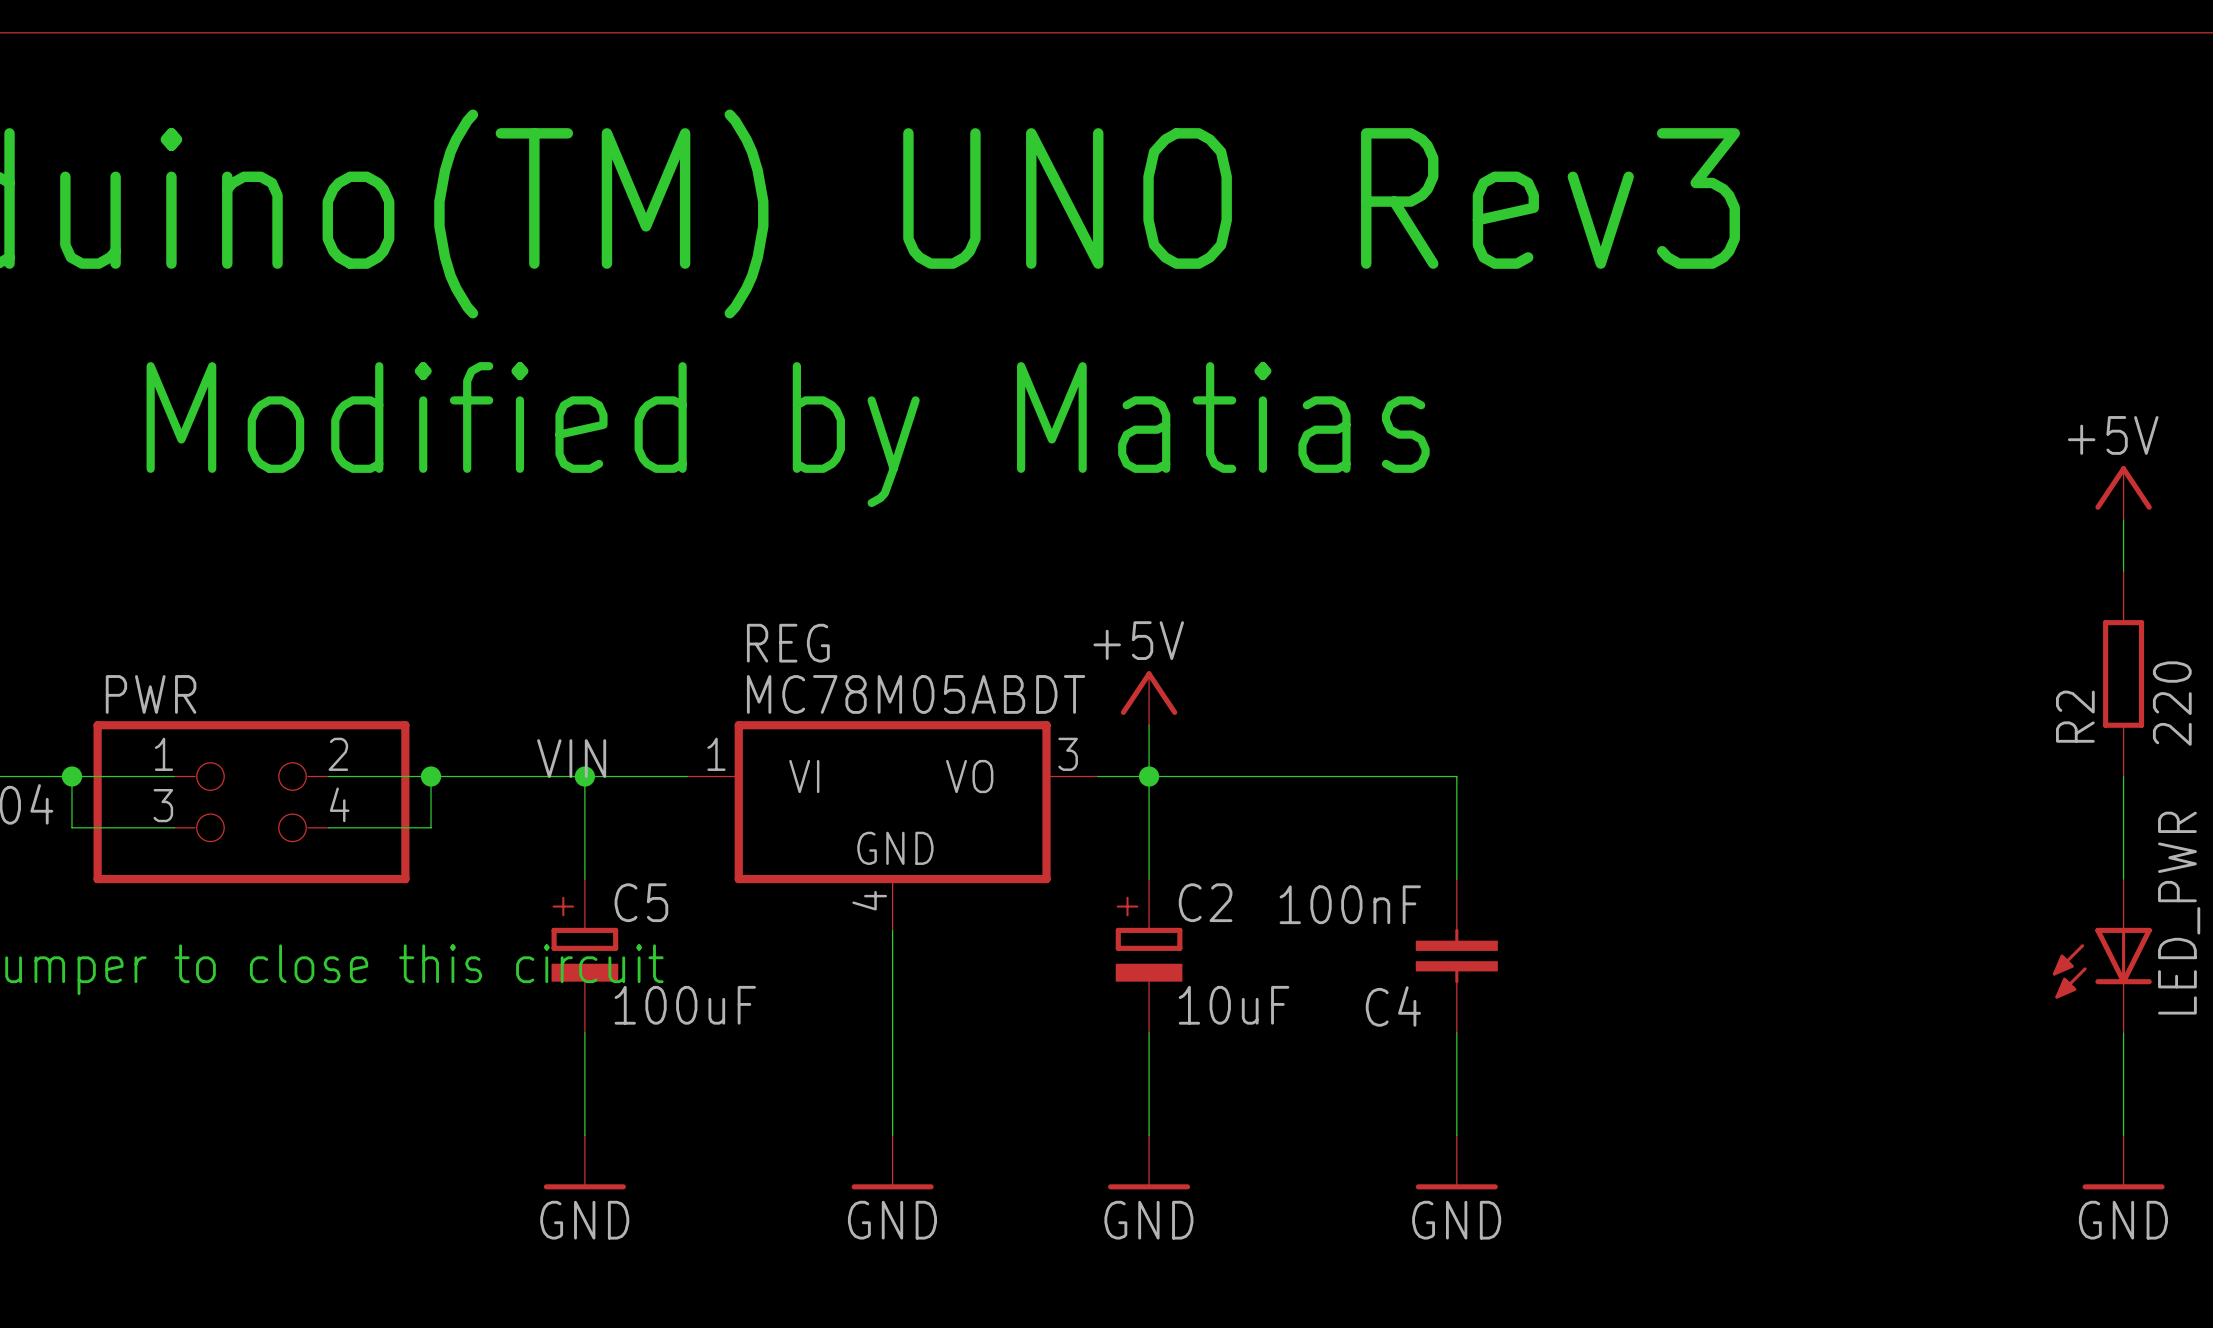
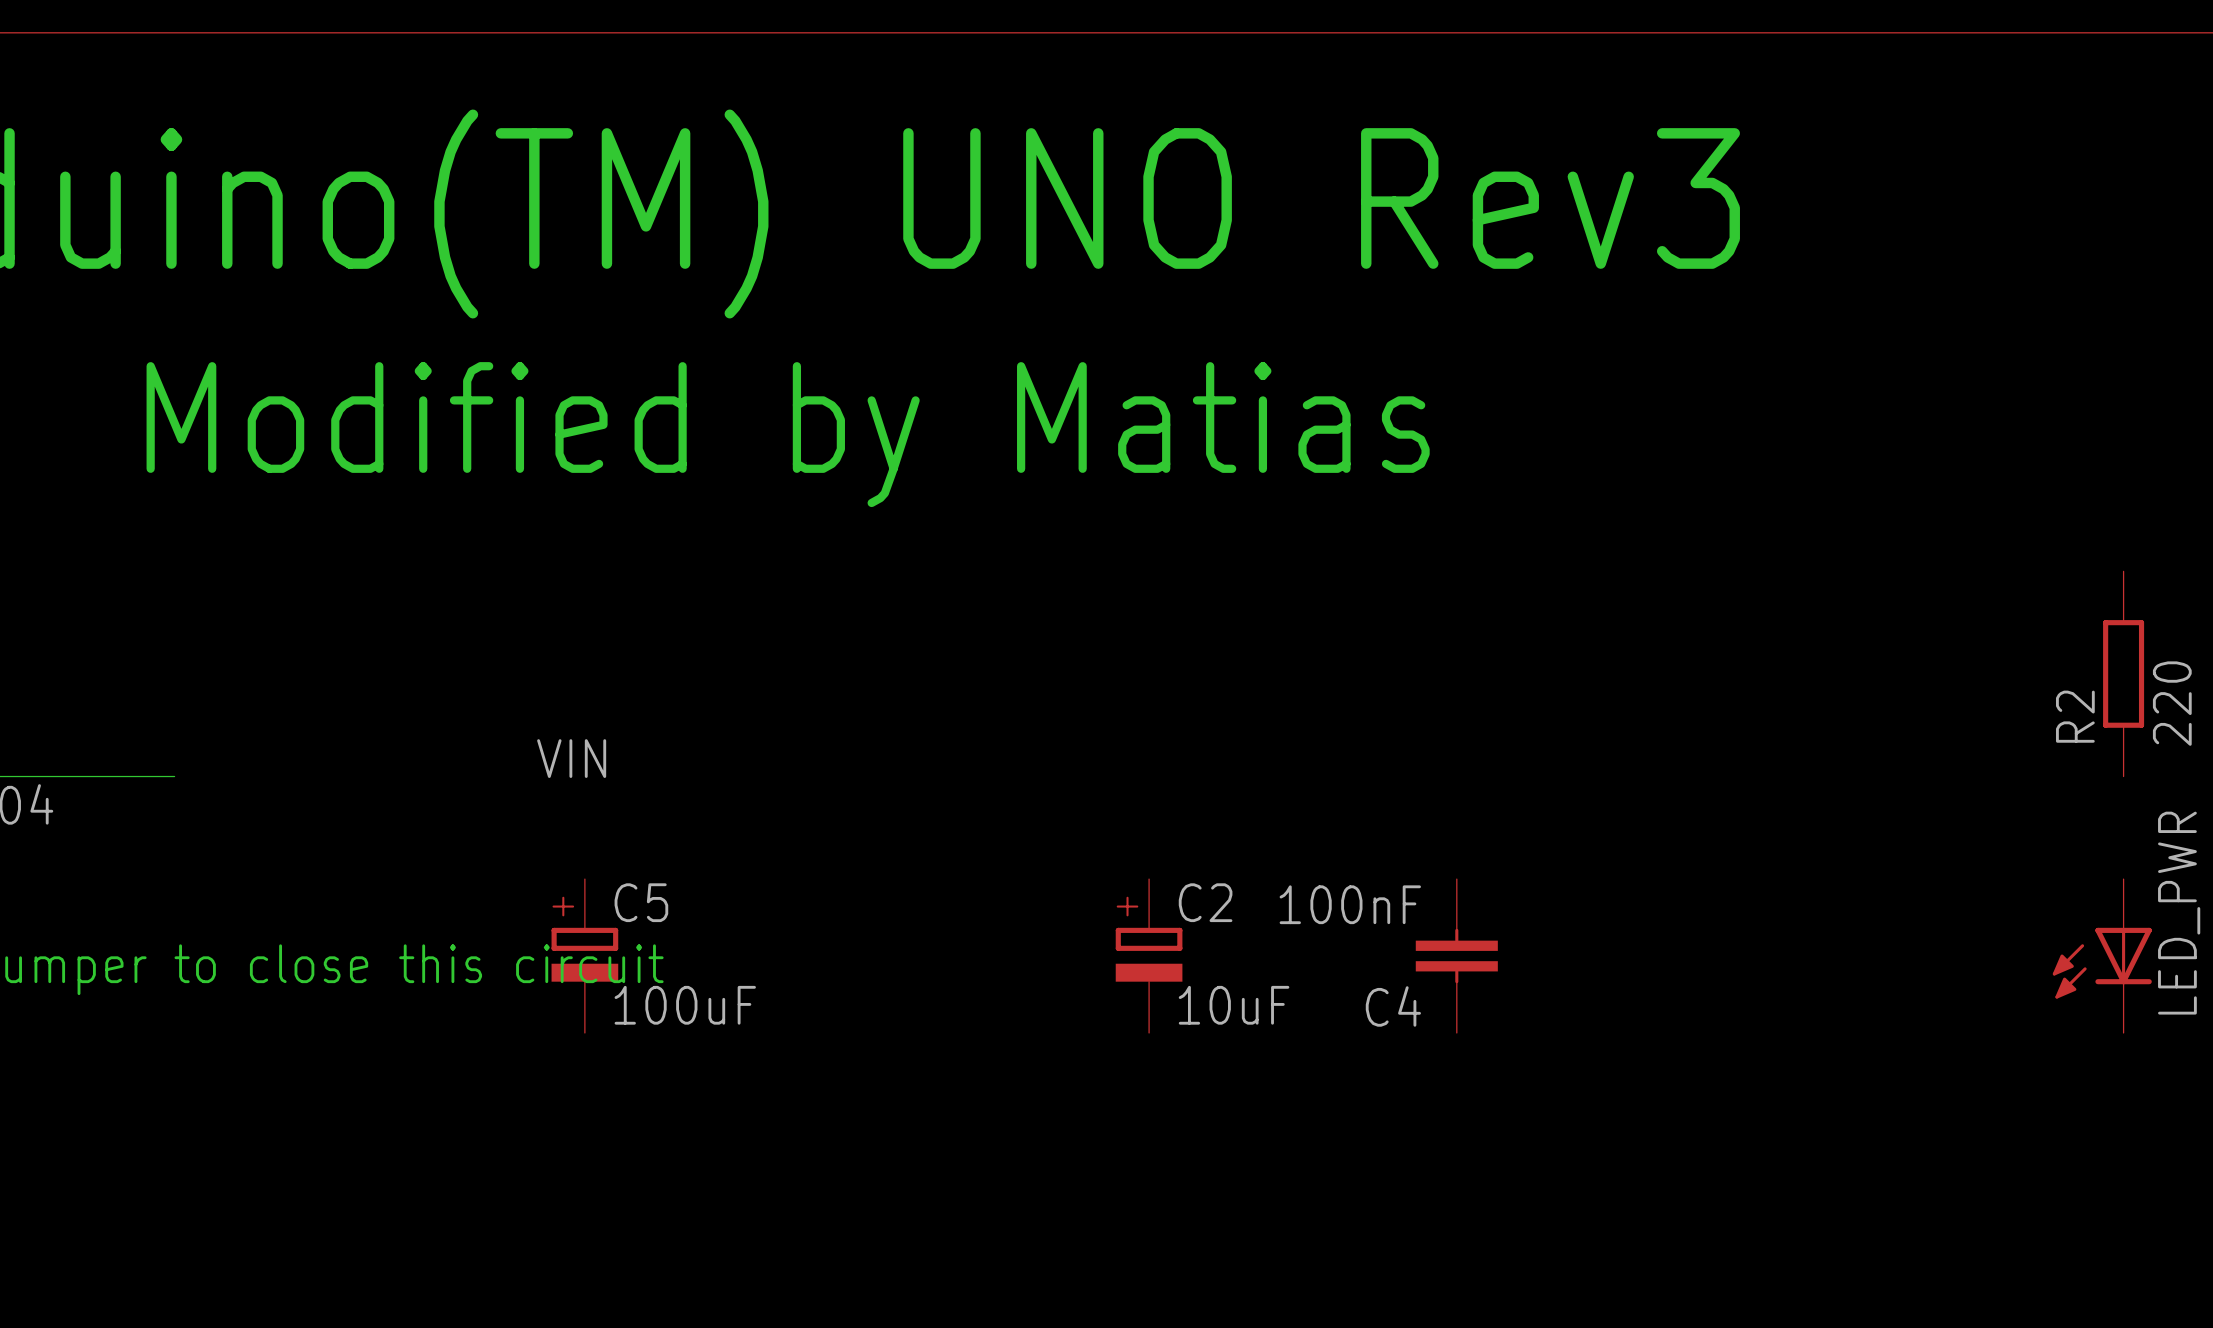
power symbol: +5V (2123, 493) -> none
wire: (2123, 520) (2123, 571) -> none
power symbol: +5V (1149, 698) -> none
wire: (1149, 725) (1149, 879) -> none
wire: (71, 776) (71, 827) (174, 827) -> none
junction: (71, 776) -> none
wire: (328, 776) (687, 776) -> none
wire: (431, 776) (431, 827) (328, 827) -> none
junction: (431, 776) -> none
wire: (584, 776) (584, 879) -> none
junction: (584, 776) -> none
wire: (1097, 776) (1456, 776) (1456, 879) -> none
junction: (1149, 776) -> none
wire: (2123, 776) (2123, 879) -> none
PWR: (251, 802) -> none
REG: MC78M05ABDT (892, 825) -> none
wire: (892, 930) (892, 1135) -> none
wire: (584, 1032) (584, 1135) -> none
wire: (1149, 1032) (1149, 1135) -> none
wire: (1456, 1032) (1456, 1135) -> none
wire: (2123, 1032) (2123, 1135) -> none
power symbol: GND (584, 1162) -> none
power symbol: GND (892, 1162) -> none
power symbol: GND (1149, 1162) -> none
power symbol: GND (1456, 1162) -> none
power symbol: GND (2123, 1162) -> none

